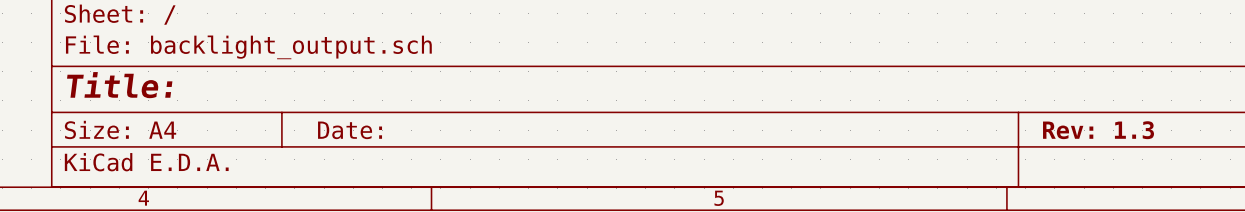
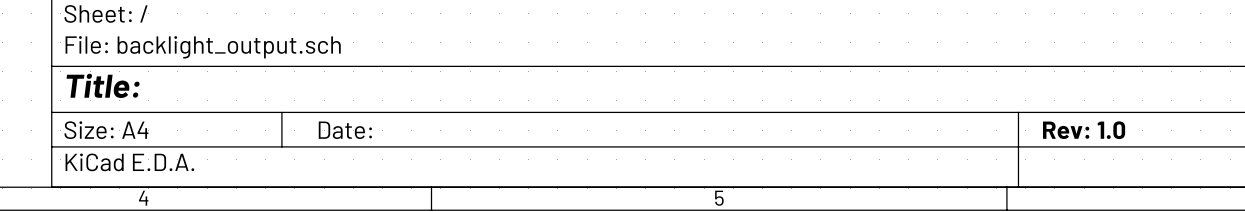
title block: Rev: 1.3 (1098, 130) -> Rev: 1.0 (1084, 130)

